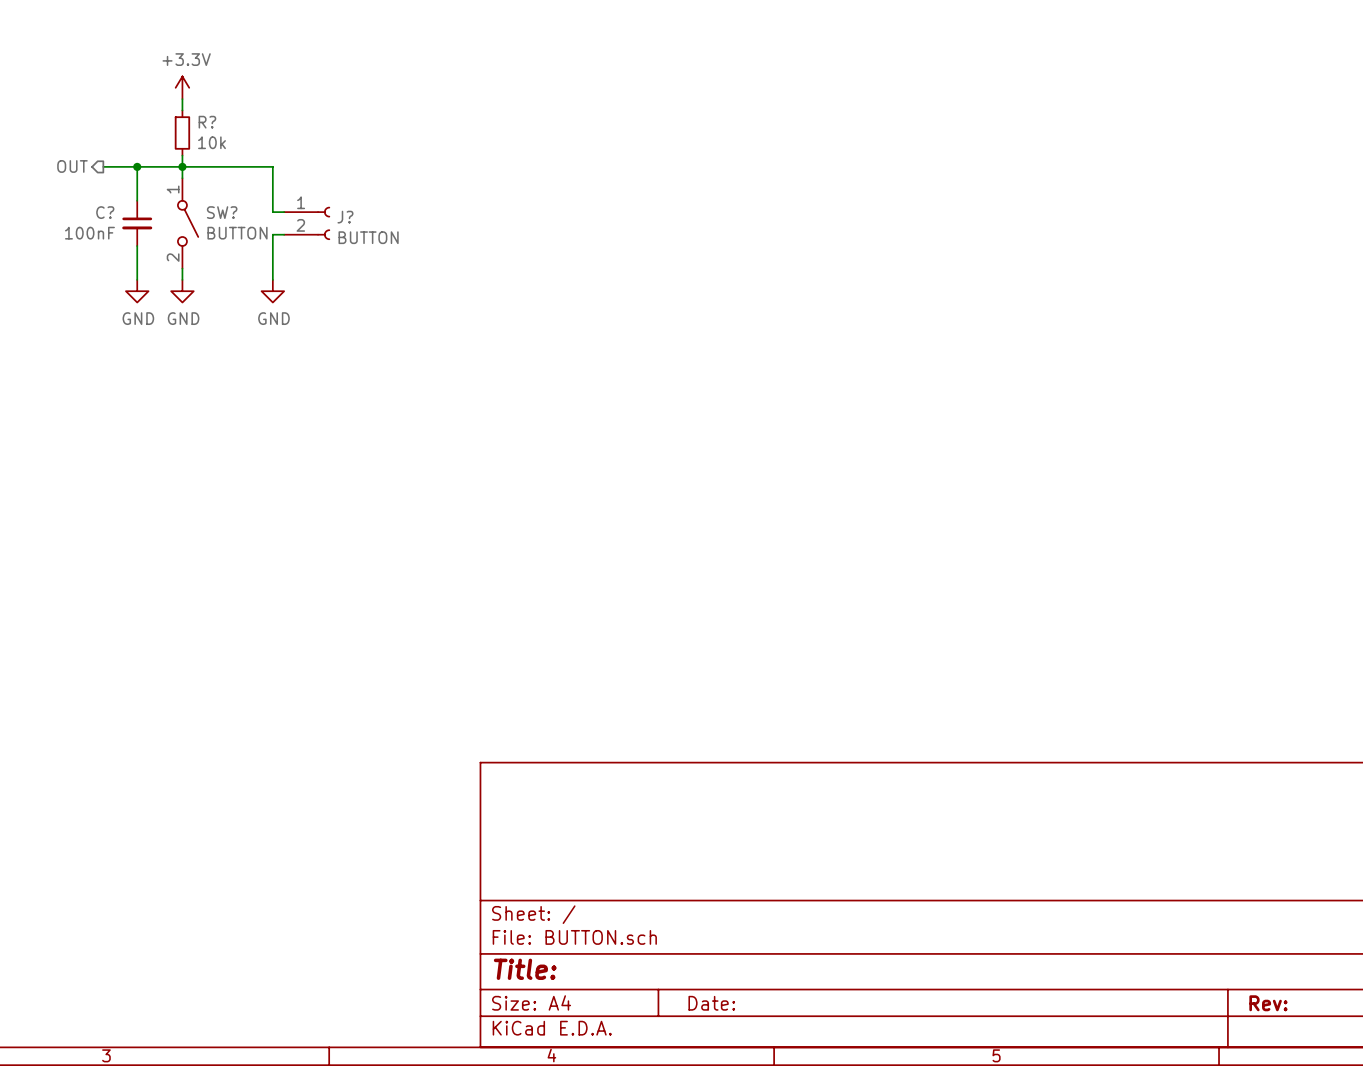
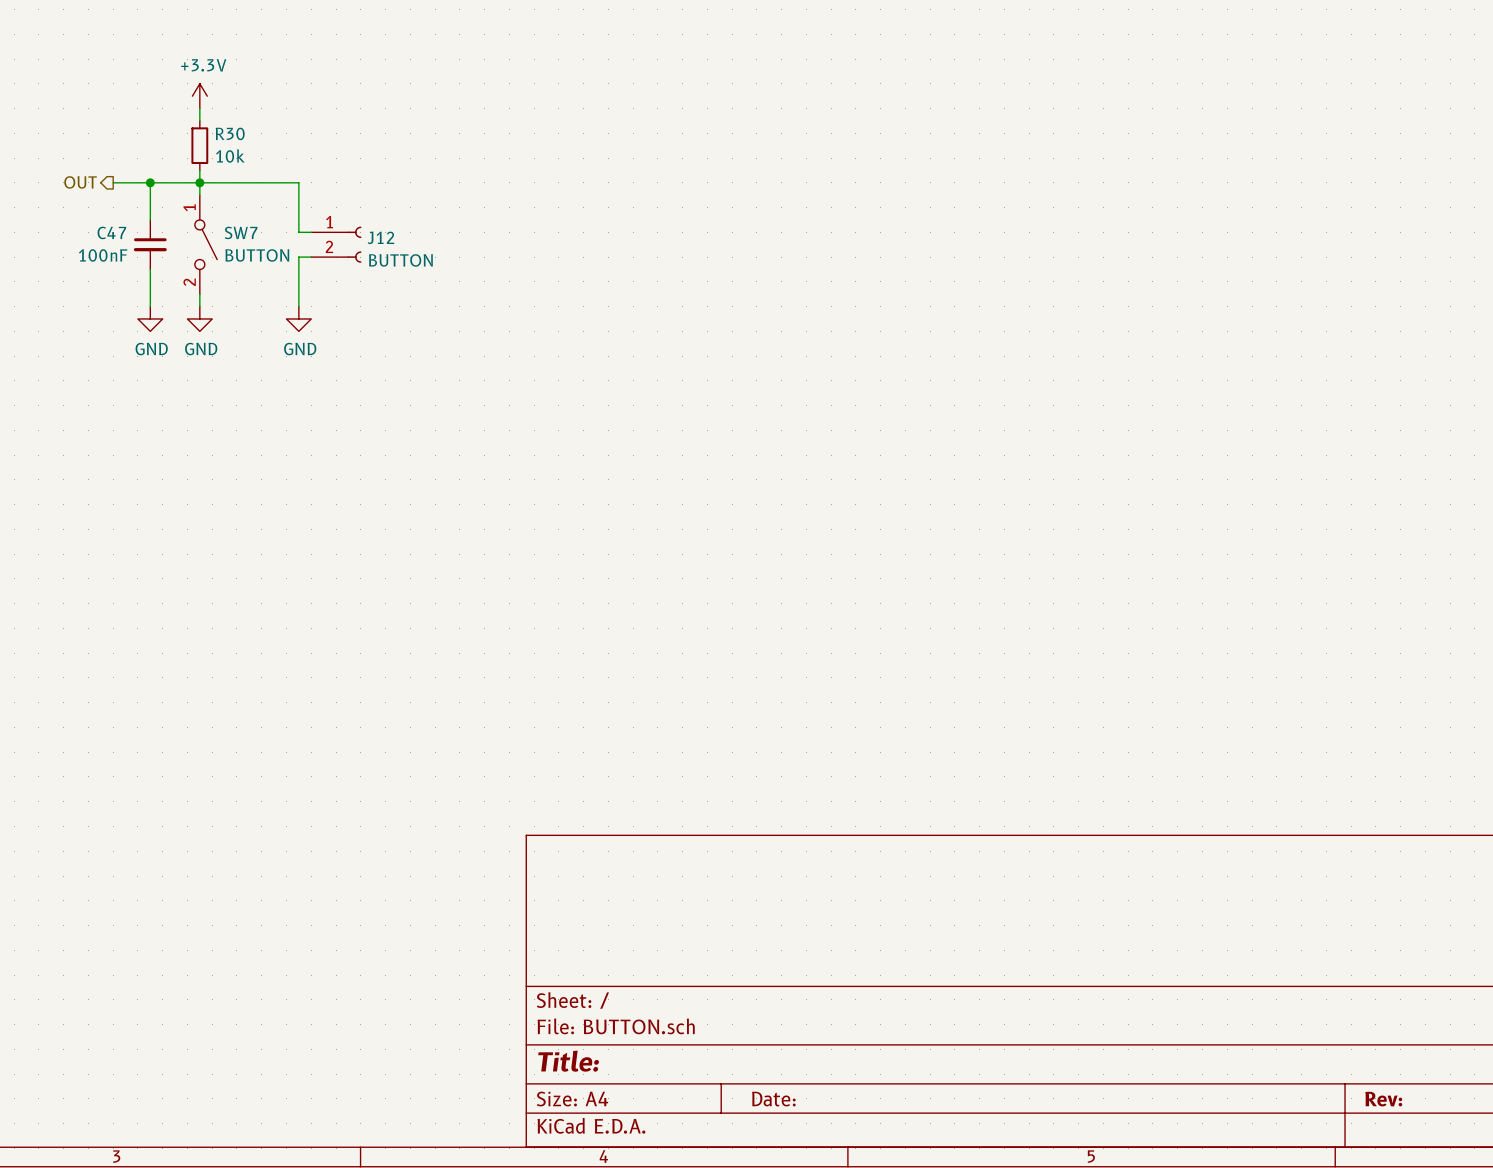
R? name: R? (207, 122) -> R30 (230, 133)
C? name: C? (105, 212) -> C47 (111, 232)
SW? name: SW? (222, 212) -> SW7 (241, 232)
J? name: J? (345, 217) -> J12 (380, 237)

